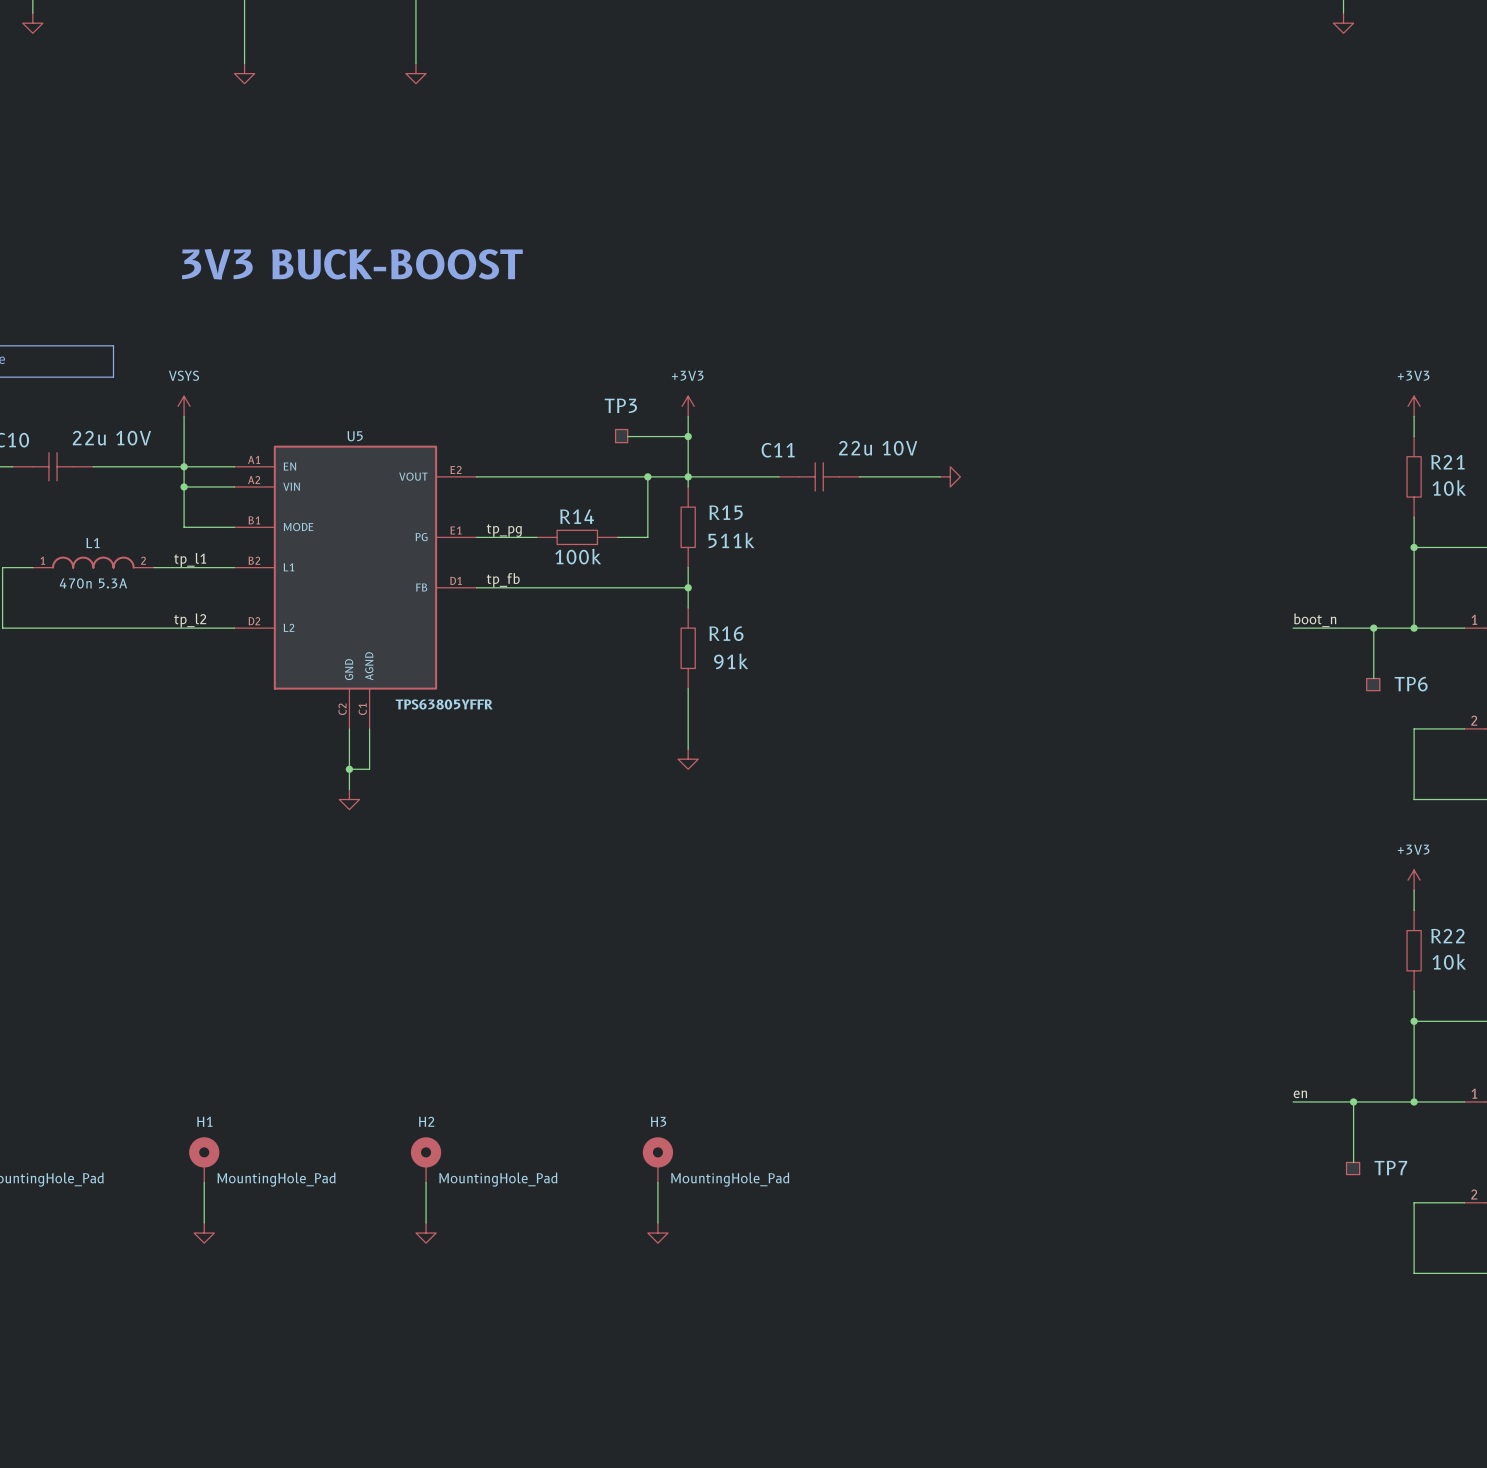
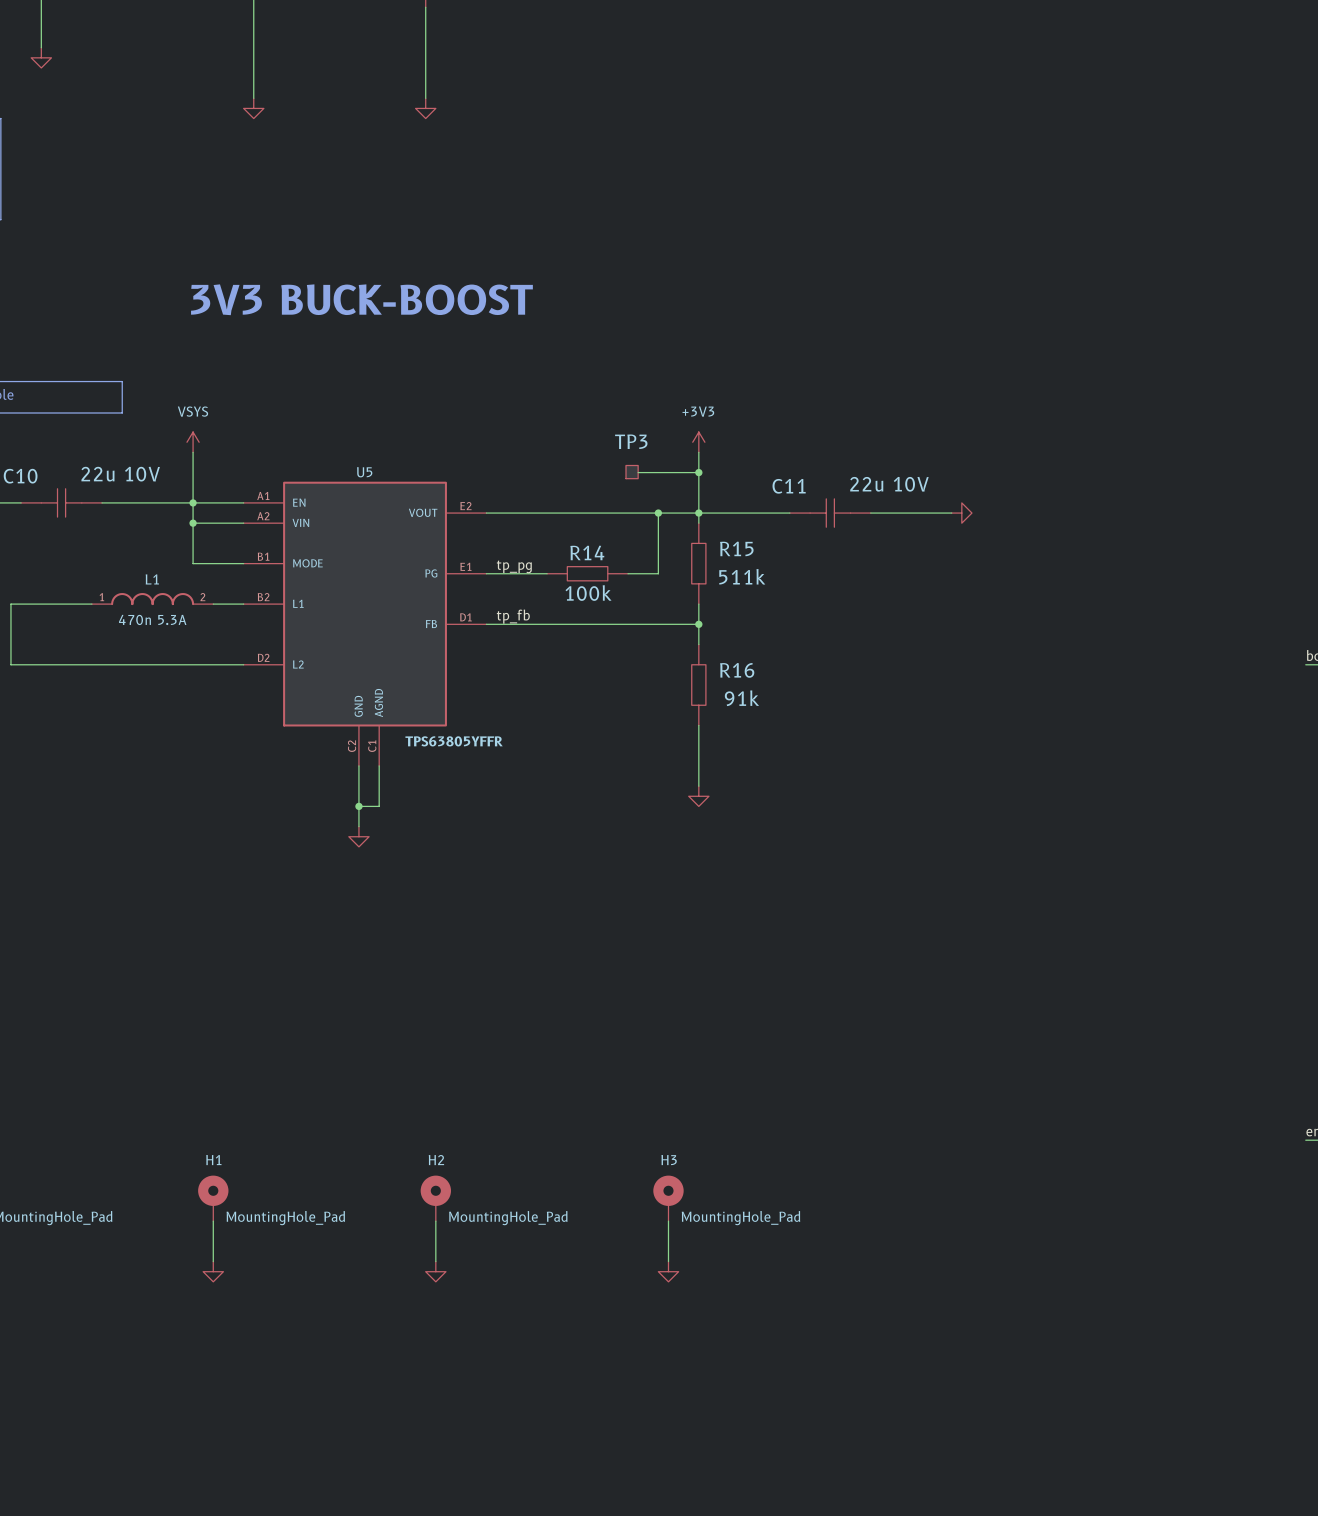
label: tp_l1 (190, 559) -> none
L1 position: (93, 562) -> (152, 599)
wire: (153, 567) (204, 567) -> (41, 604) (91, 604)
label: tp_l2 (190, 620) -> none

